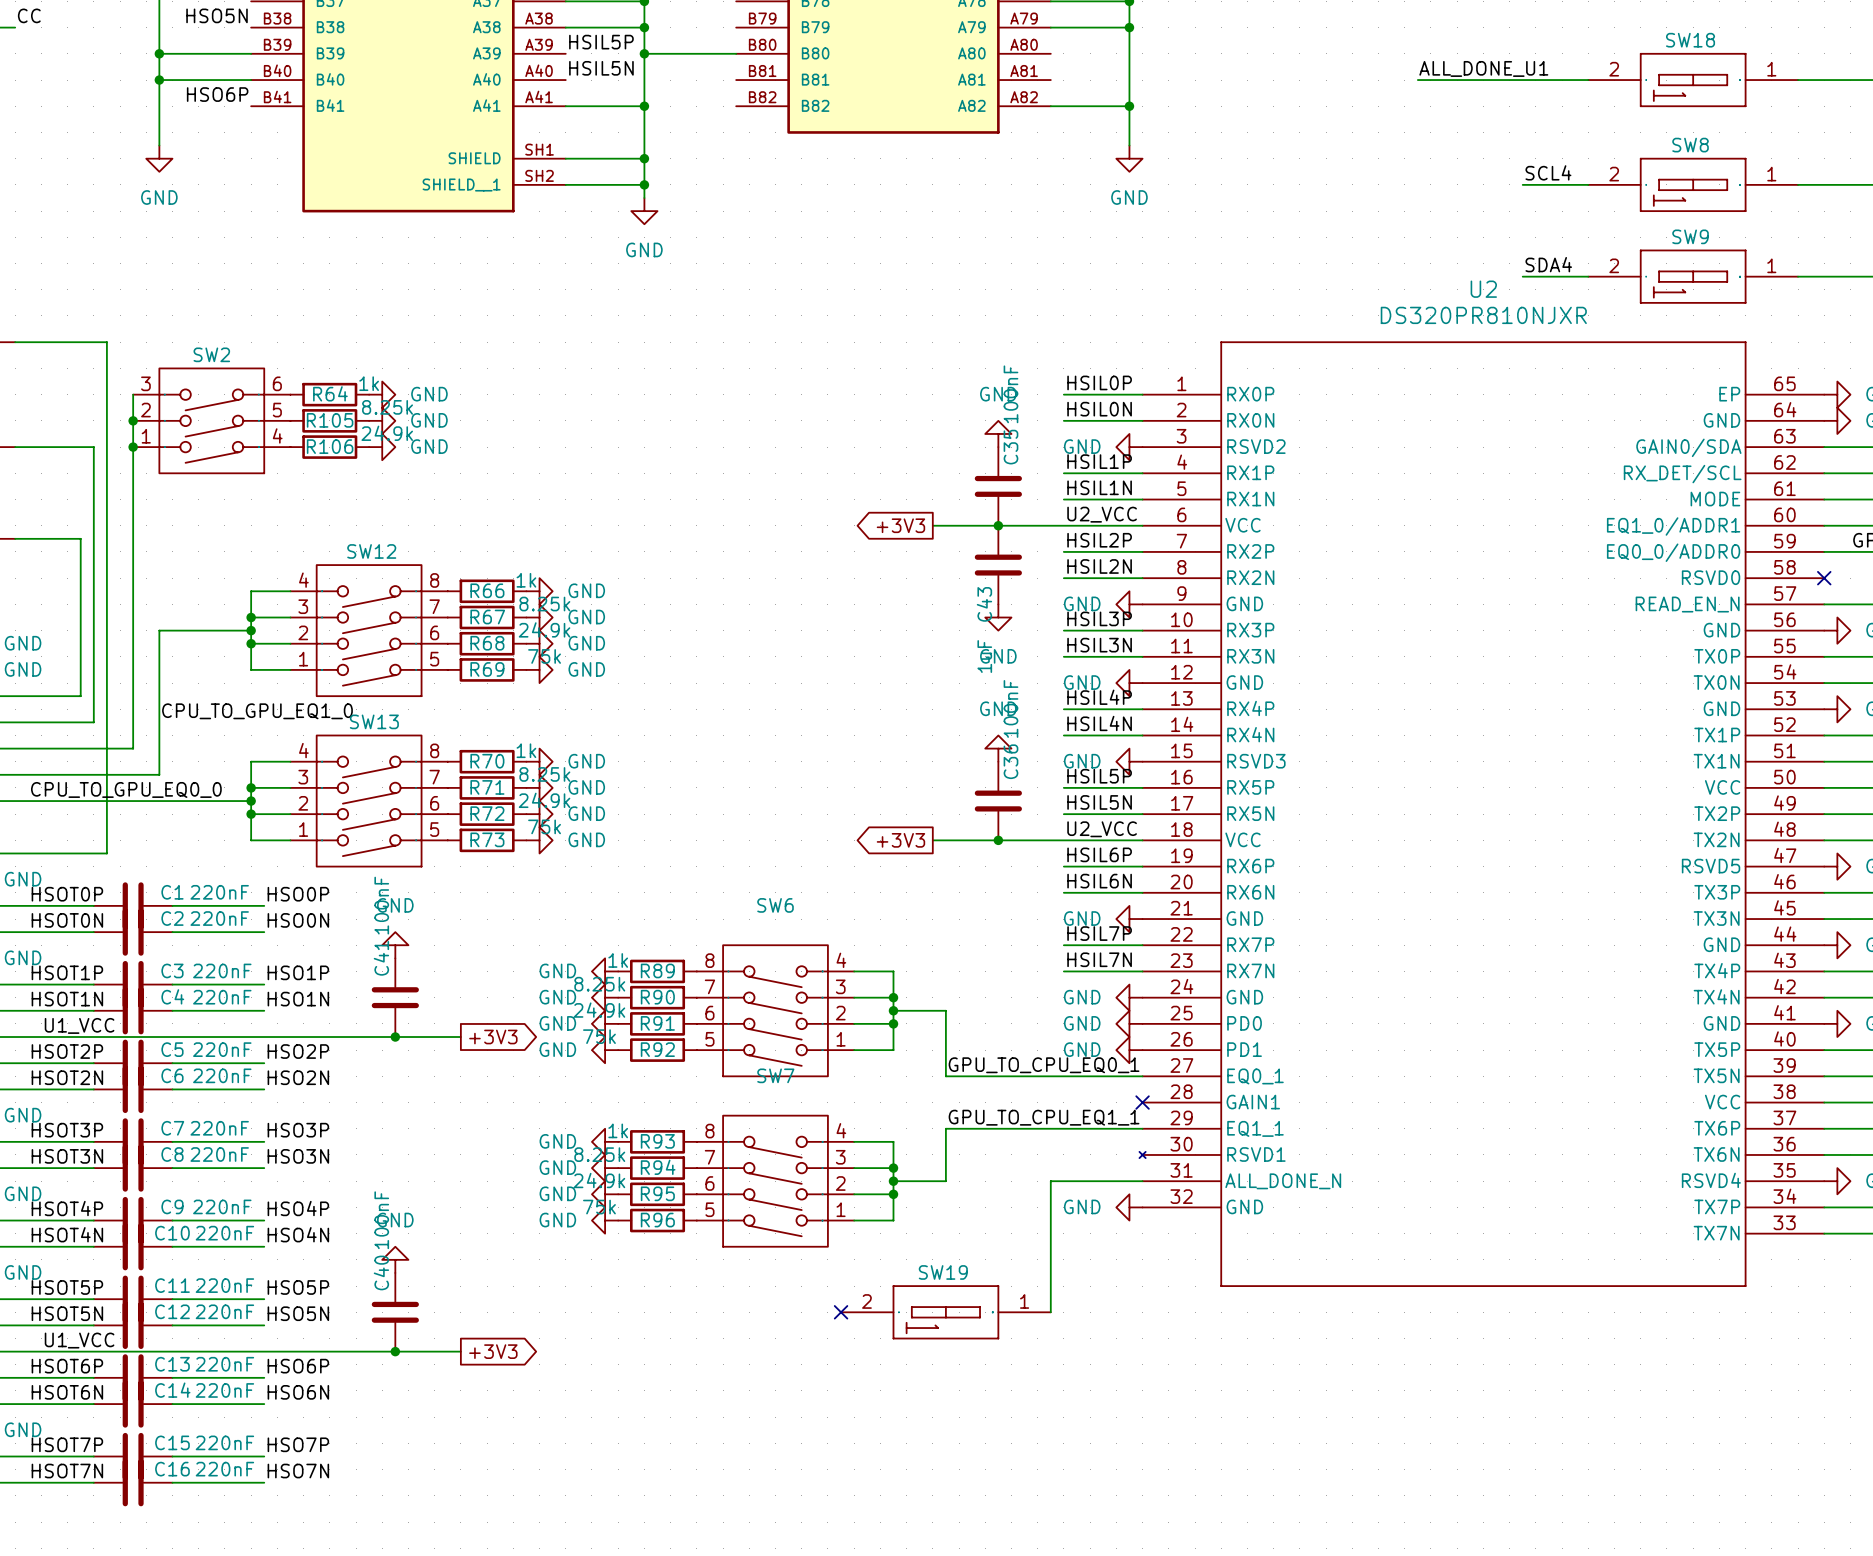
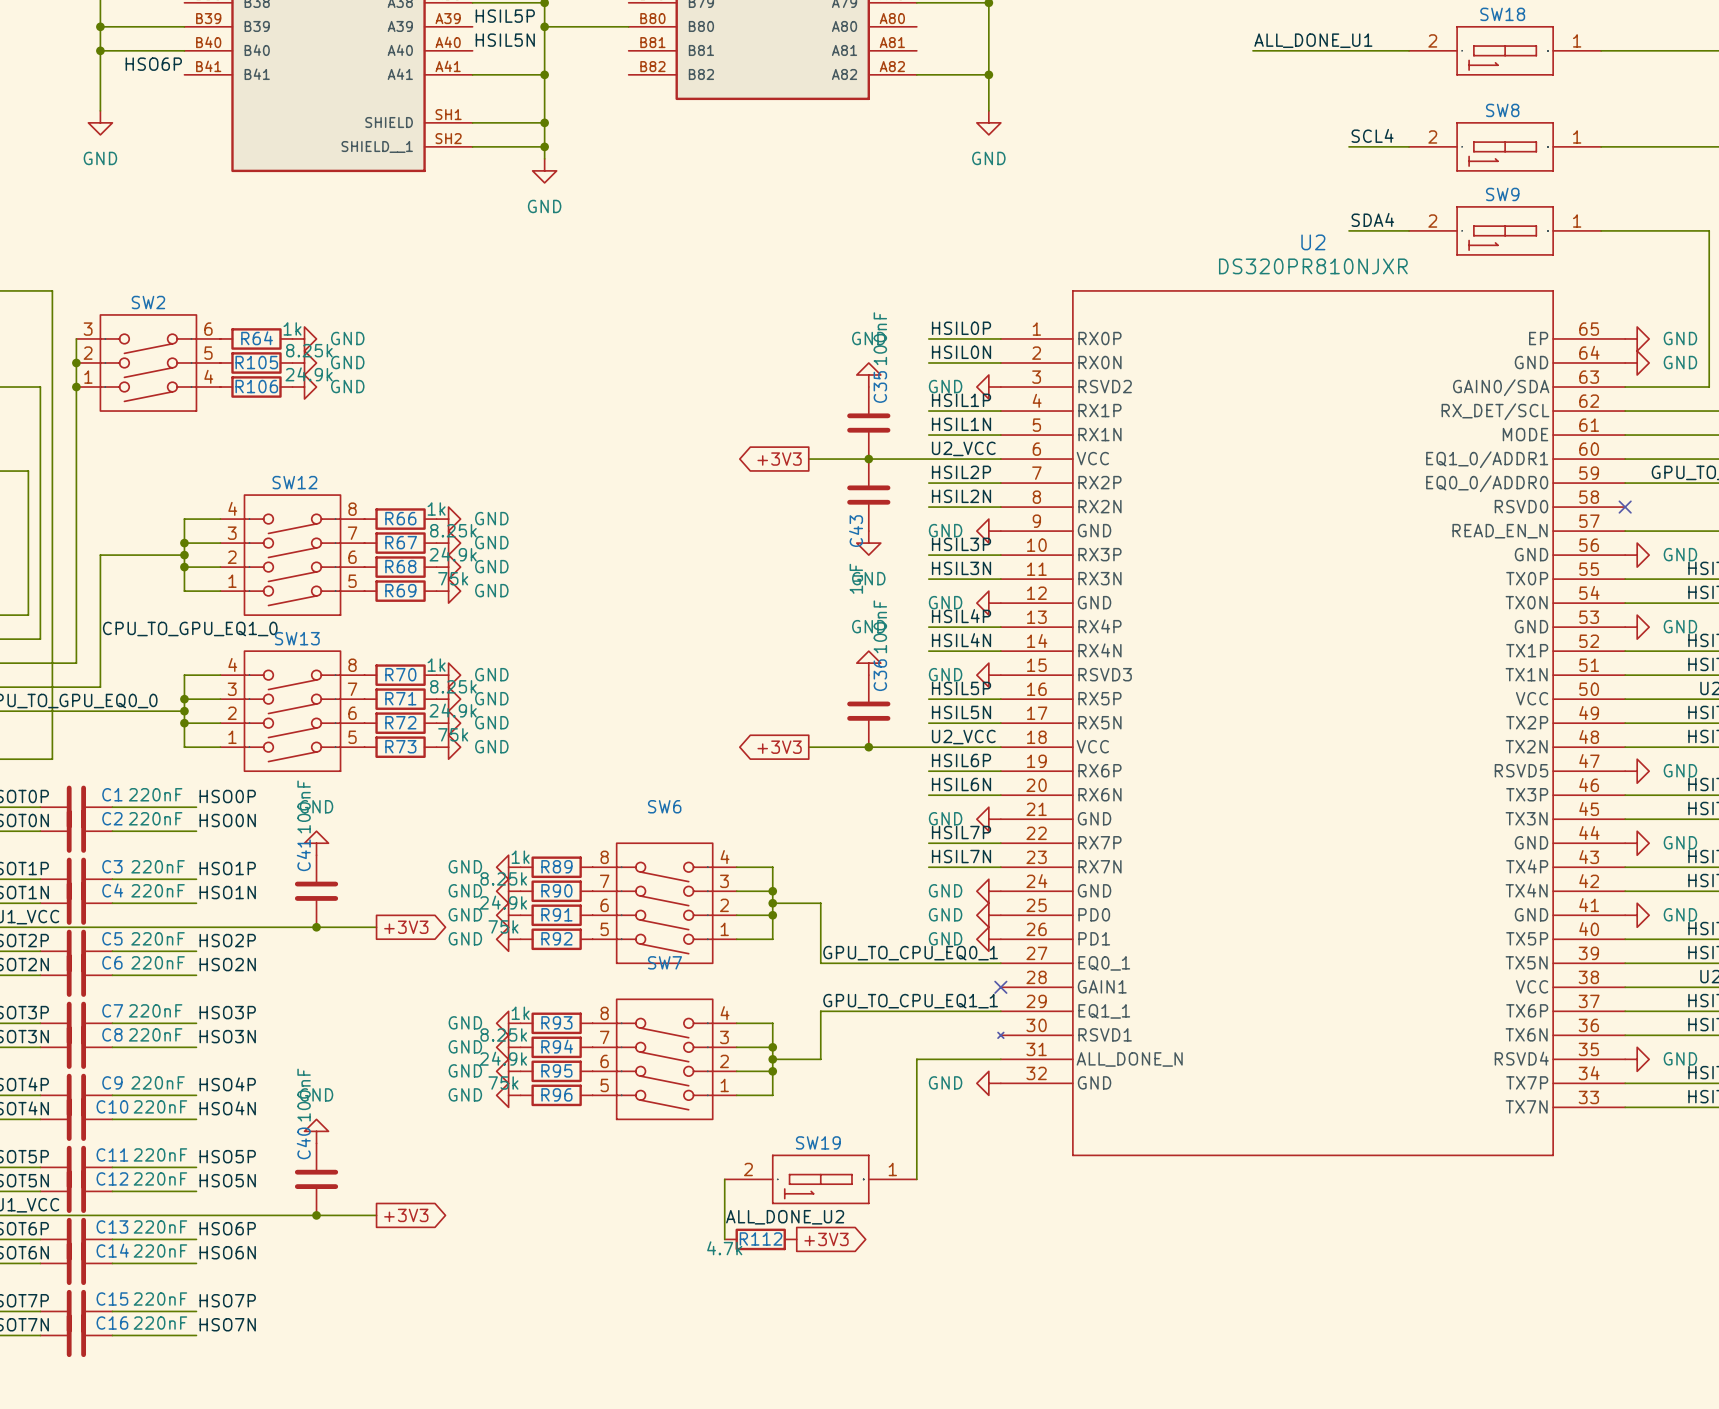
wire: none -> (724, 1179) (724, 1239)
no-connect mark: (841, 1312) -> none
label: none -> ALL_DONE_U2 (785, 1217)
R112: none -> 4.7k (760, 1239)
global label: none -> +3V3 (826, 1239)

